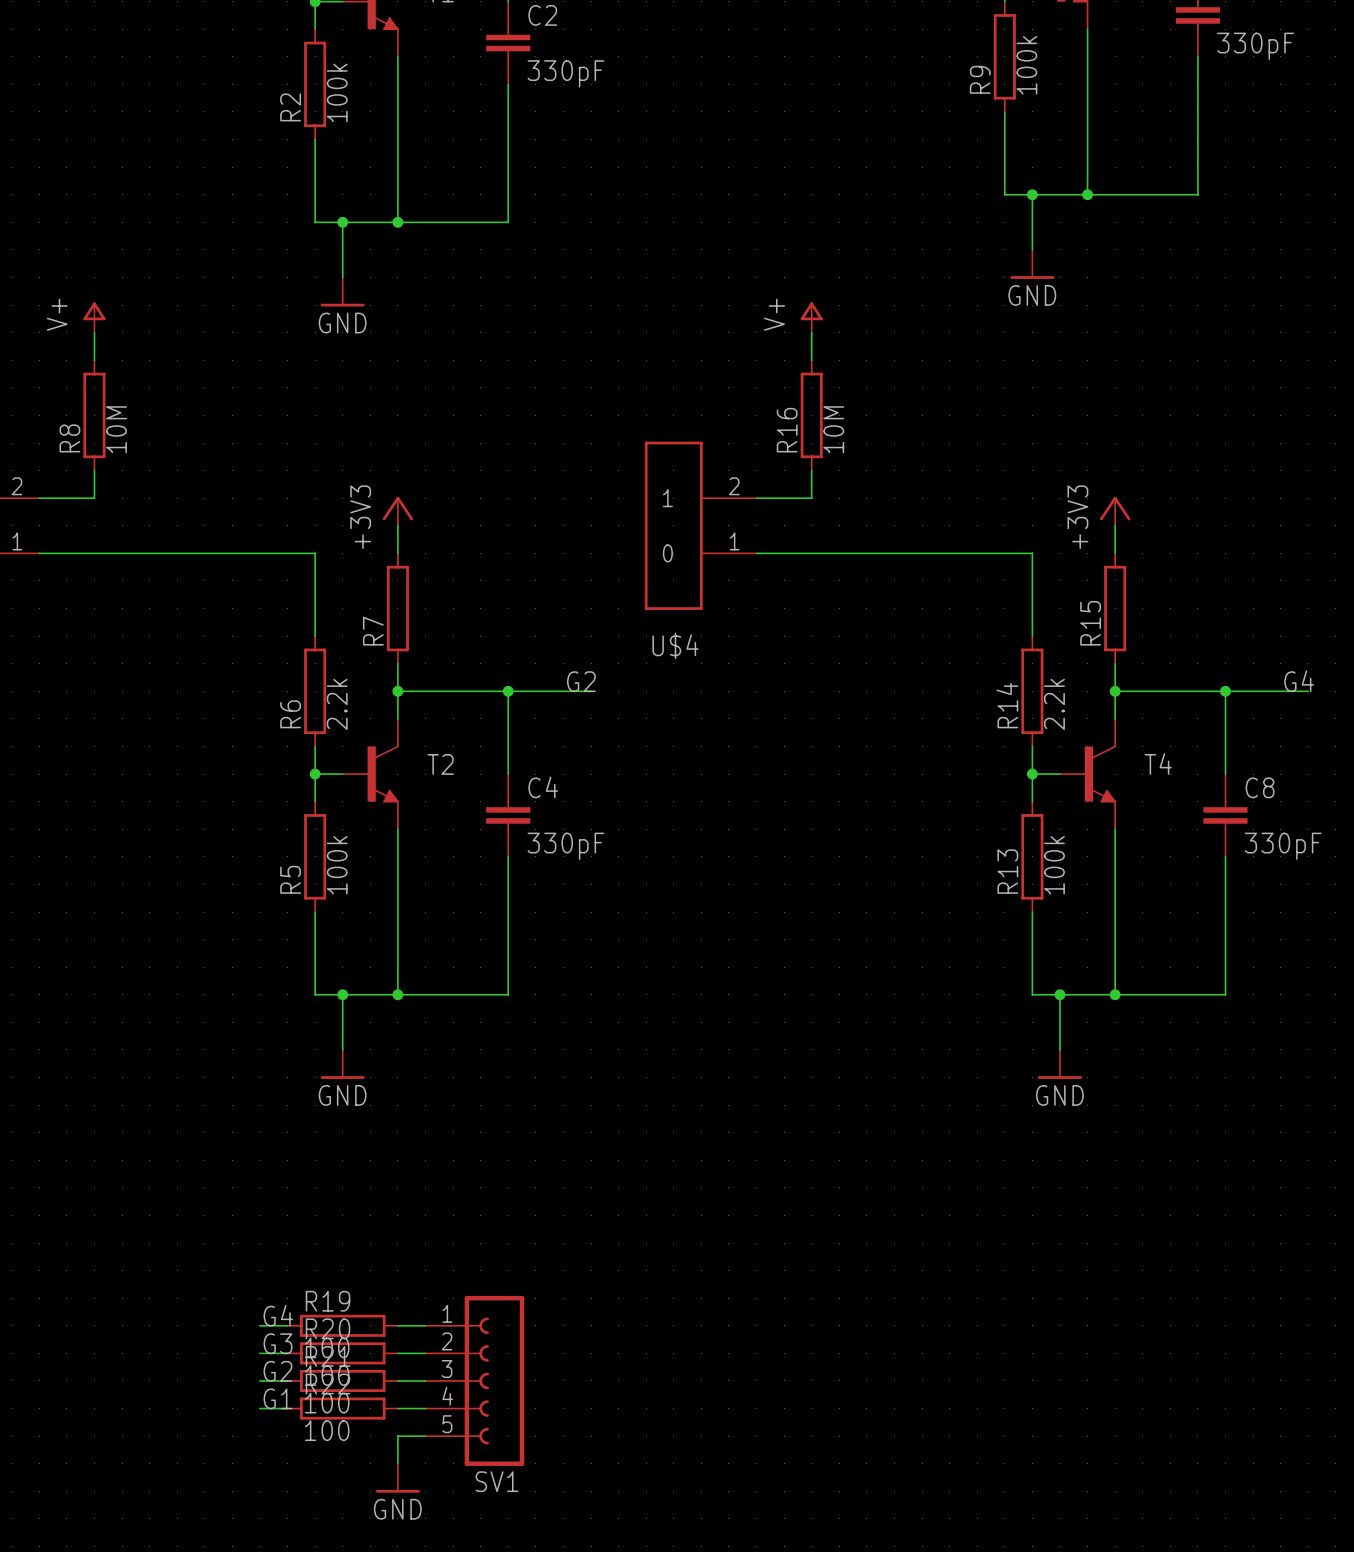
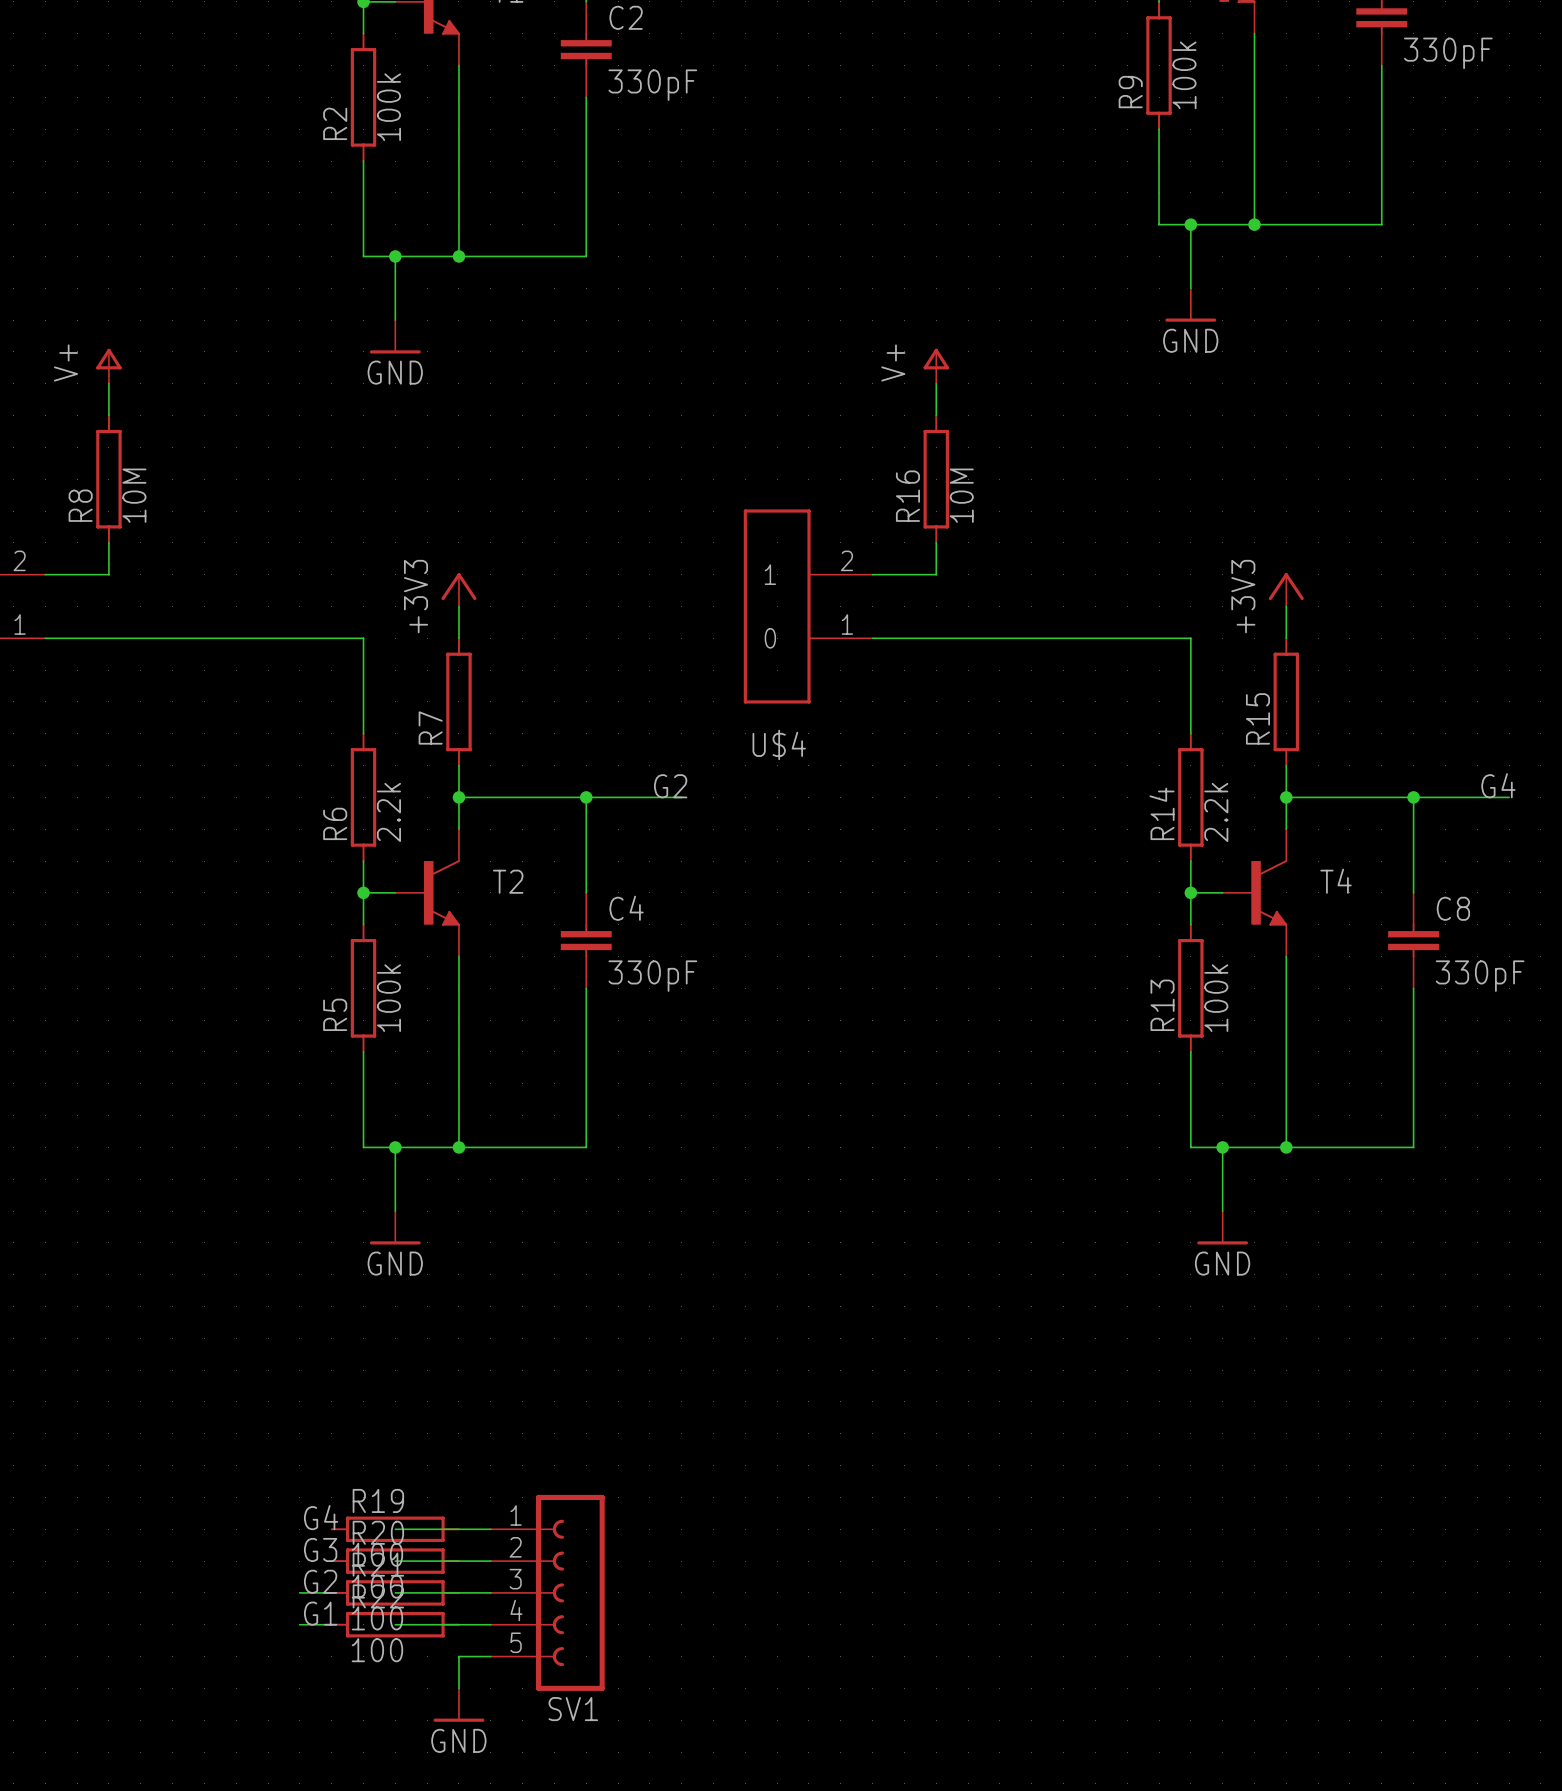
wire: (259, 1325) (287, 1325) -> none
wire: none -> (395, 1529) (458, 1529)
wire: (259, 1353) (287, 1353) -> none
wire: none -> (395, 1561) (458, 1561)
wire: none -> (395, 1592) (458, 1592)
wire: none -> (395, 1624) (458, 1624)

